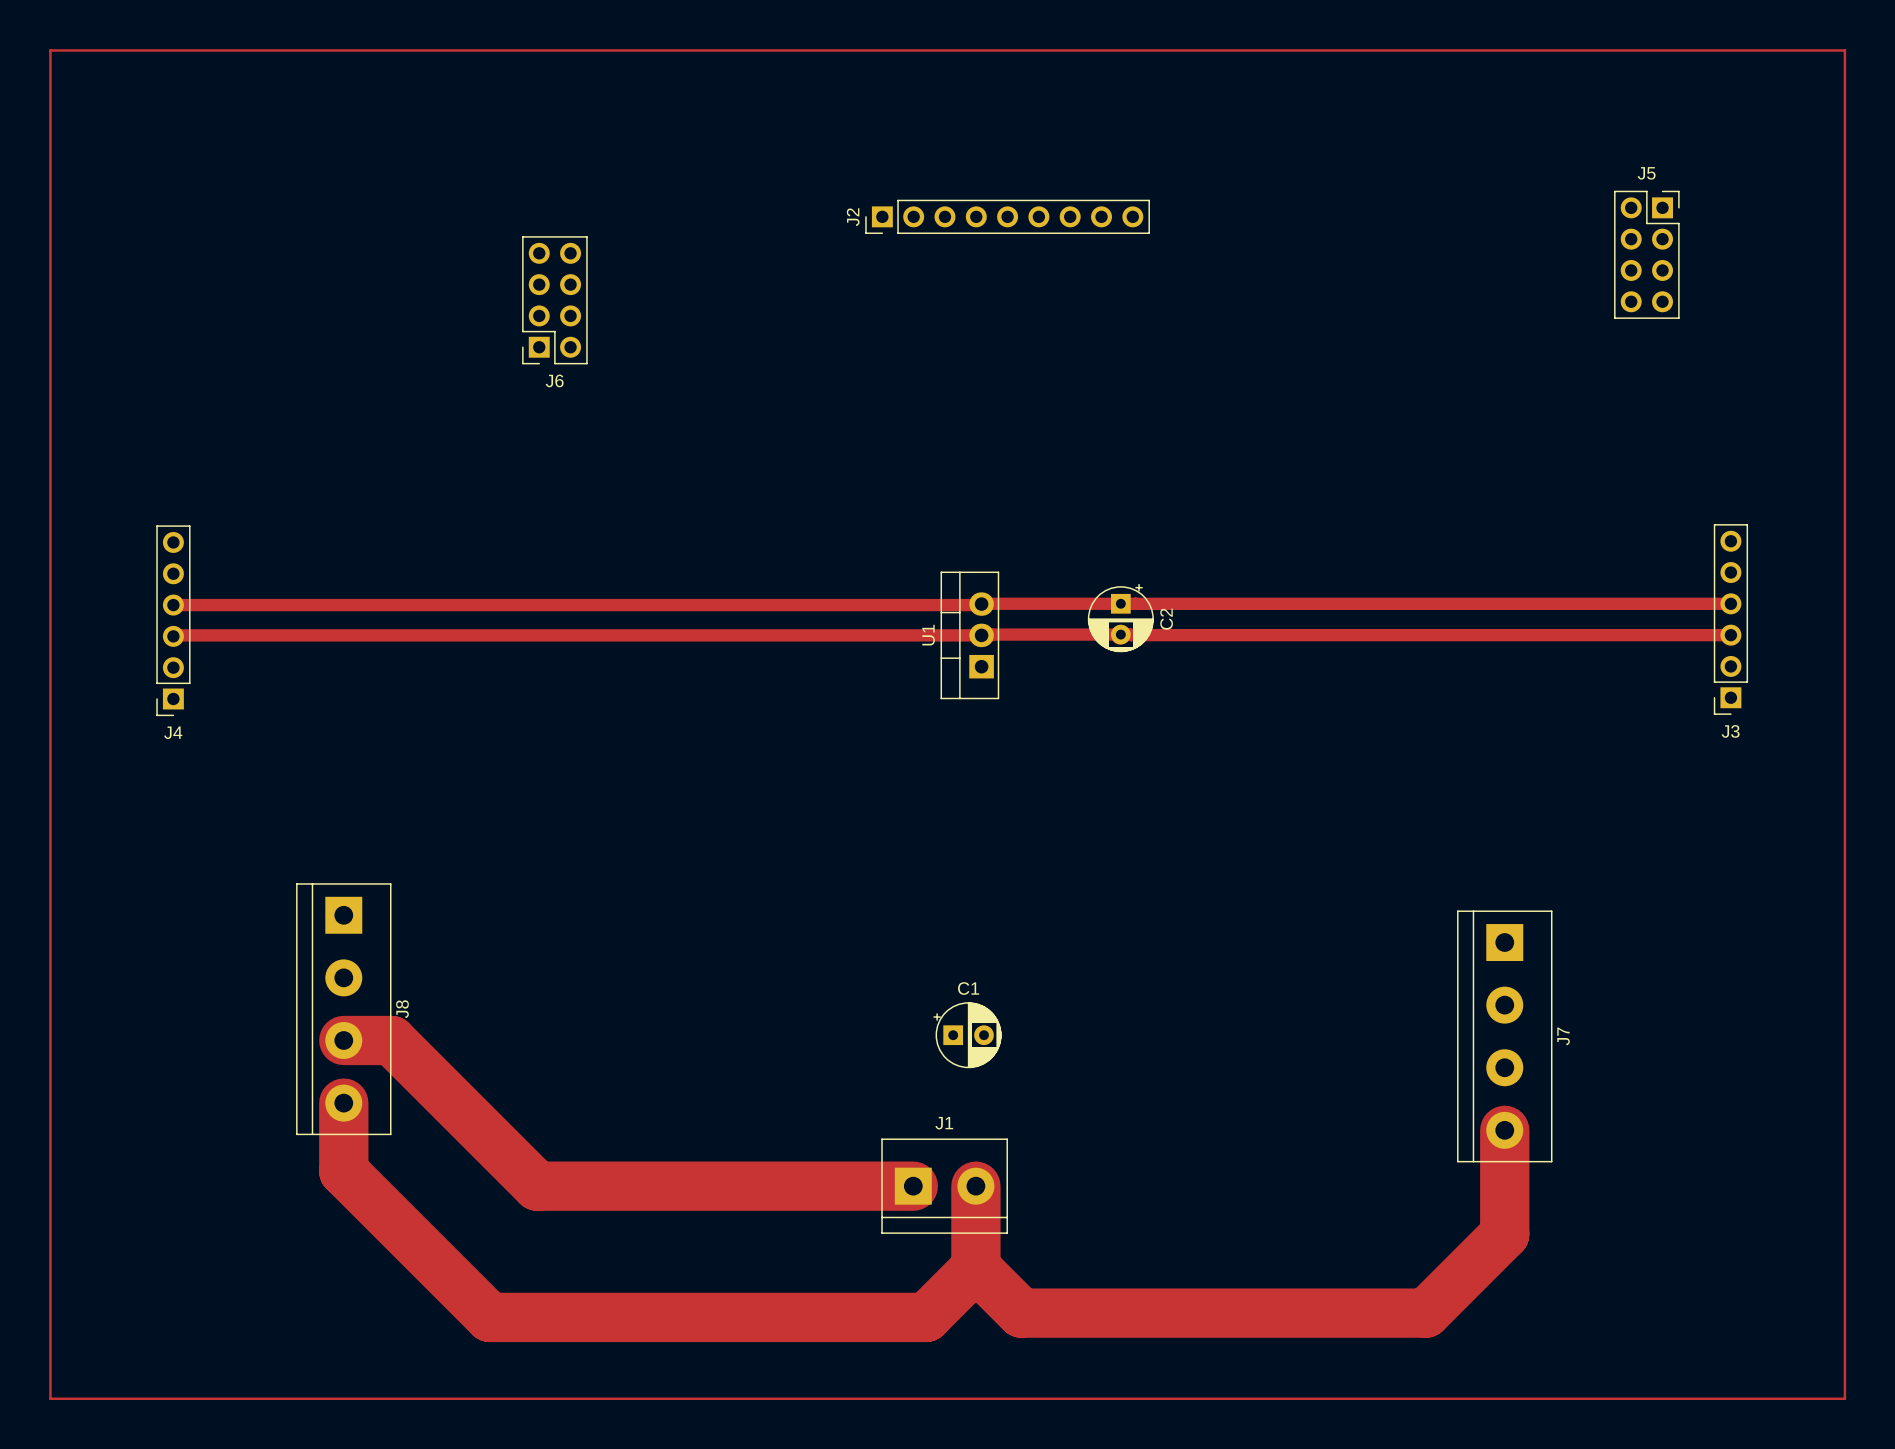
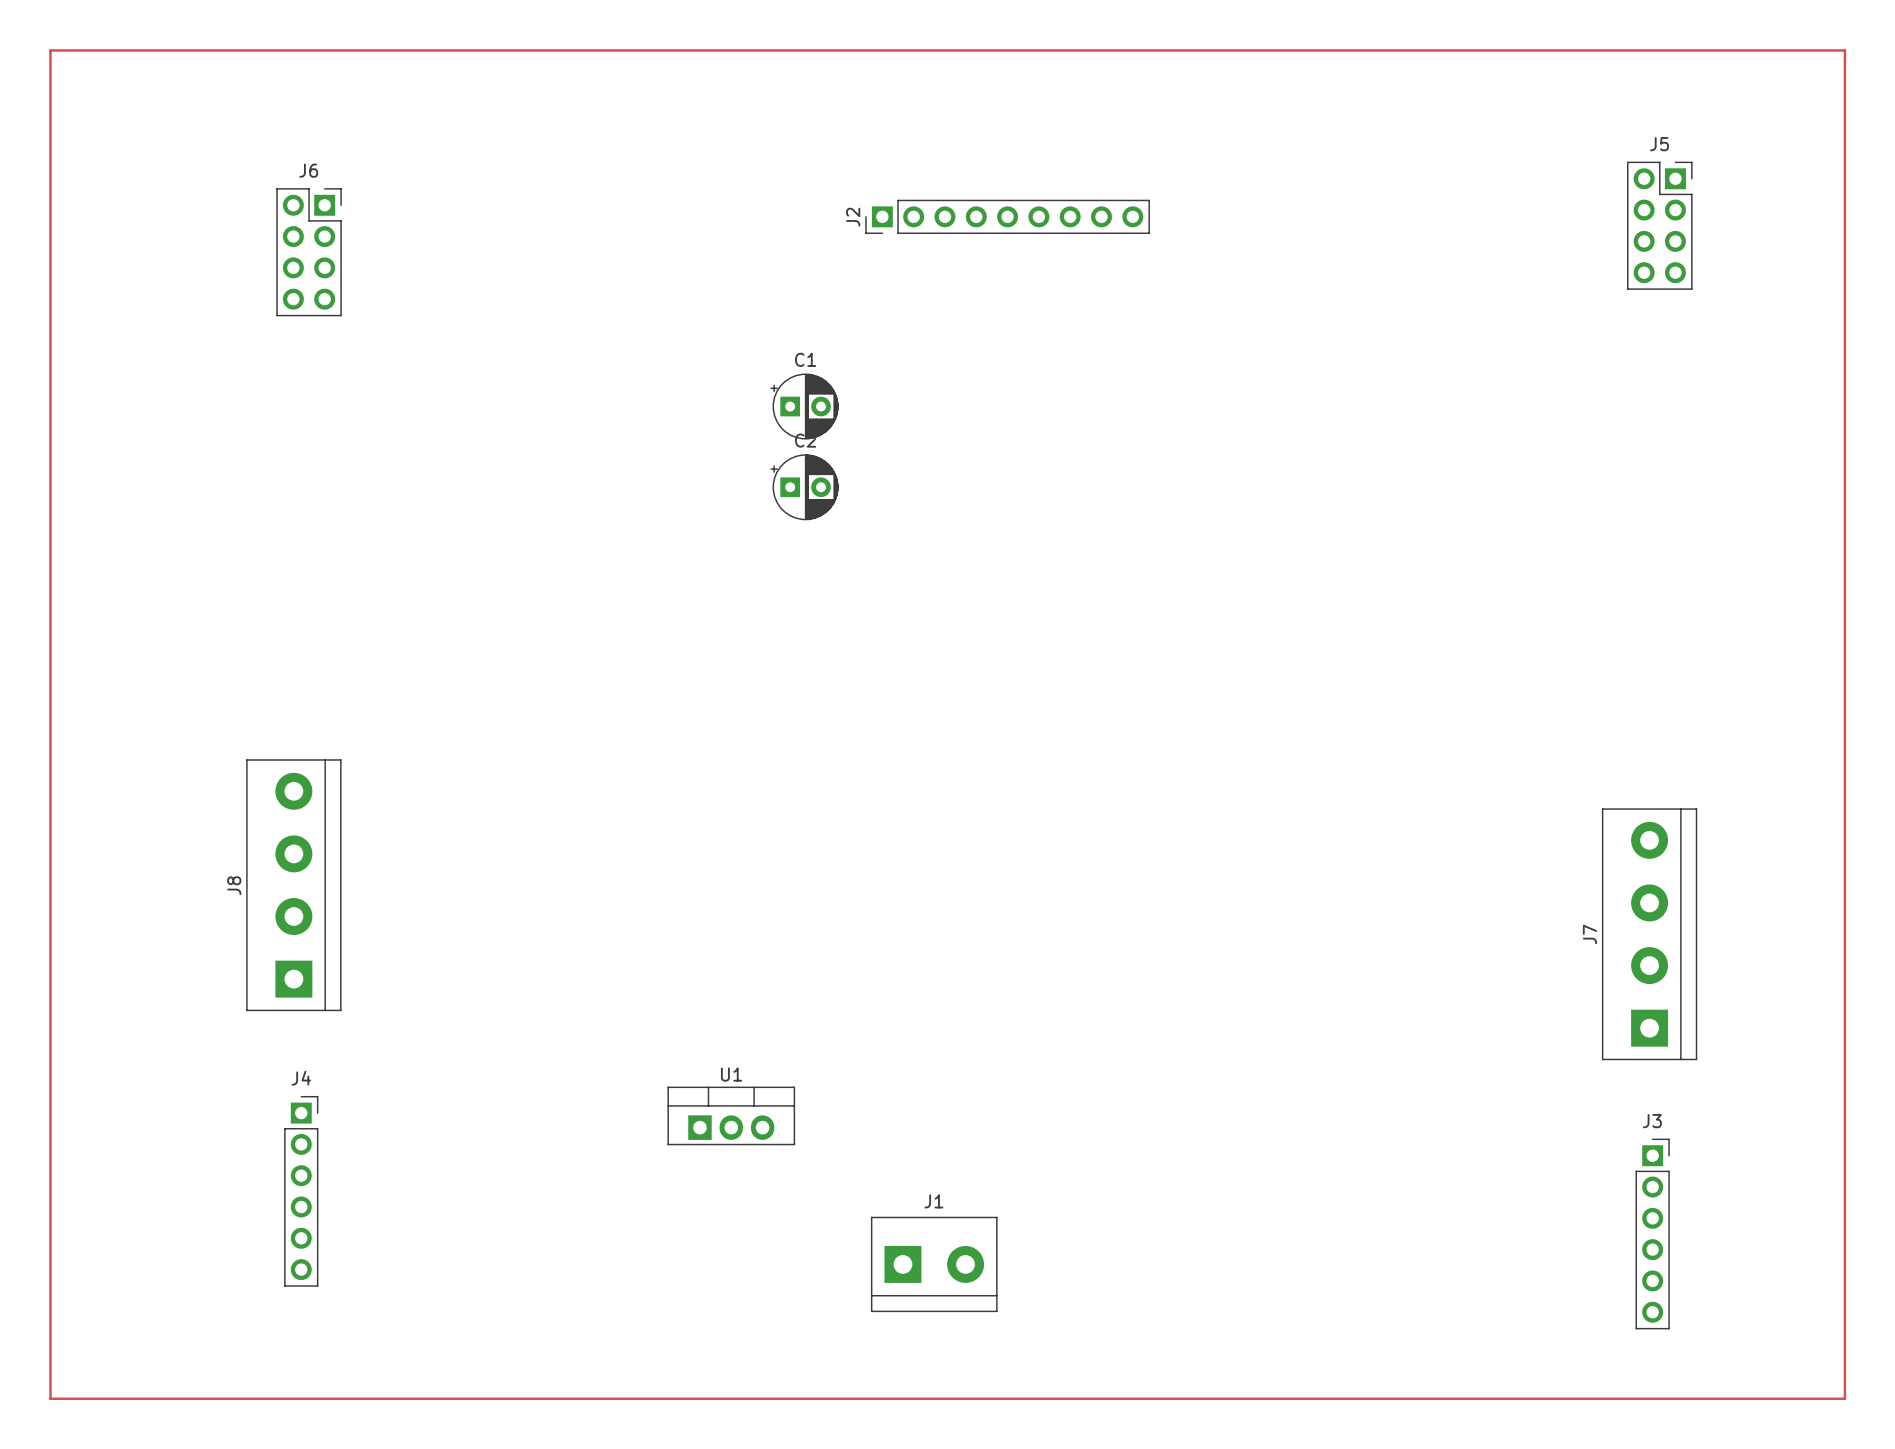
J5 position: (1646, 254) -> (1659, 225)
J6 rotation: 0° (554, 300) -> 180° (309, 252)
J6 position: (554, 300) -> (309, 252)
top track: (1135, 603) (174, 604) -> none
top track: (1135, 603) (1730, 603) -> none
C2 rotation: 0° (1120, 618) -> 90° counterclockwise (804, 487)
C2 position: (1120, 618) -> (804, 487)
J3 rotation: 0° (1730, 619) -> 180° (1652, 1233)
J3 position: (1730, 619) -> (1652, 1233)
J4 rotation: 0° (173, 620) -> 180° (301, 1191)
J4 position: (173, 620) -> (301, 1191)
U1 rotation: 0° (969, 635) -> 90° clockwise (731, 1115)
U1 position: (969, 635) -> (731, 1115)
top track: (1730, 635) (173, 636) -> none
J8 rotation: 0° (343, 1009) -> 180° (293, 885)
C1 position: (967, 1035) -> (804, 406)
J7 rotation: 0° (1504, 1036) -> 180° (1649, 934)
J7 position: (1504, 1036) -> (1649, 934)
top track: (343, 1040) (391, 1040) (537, 1186) (913, 1186) -> none
top track: (343, 1103) (343, 1171) (489, 1317) (926, 1317) (975, 1267) -> none
top track: (1504, 1130) (1504, 1234) (1425, 1313) (1021, 1313) (975, 1267) -> none
J1 position: (944, 1186) -> (934, 1264)
top track: (975, 1186) (975, 1267) -> none

